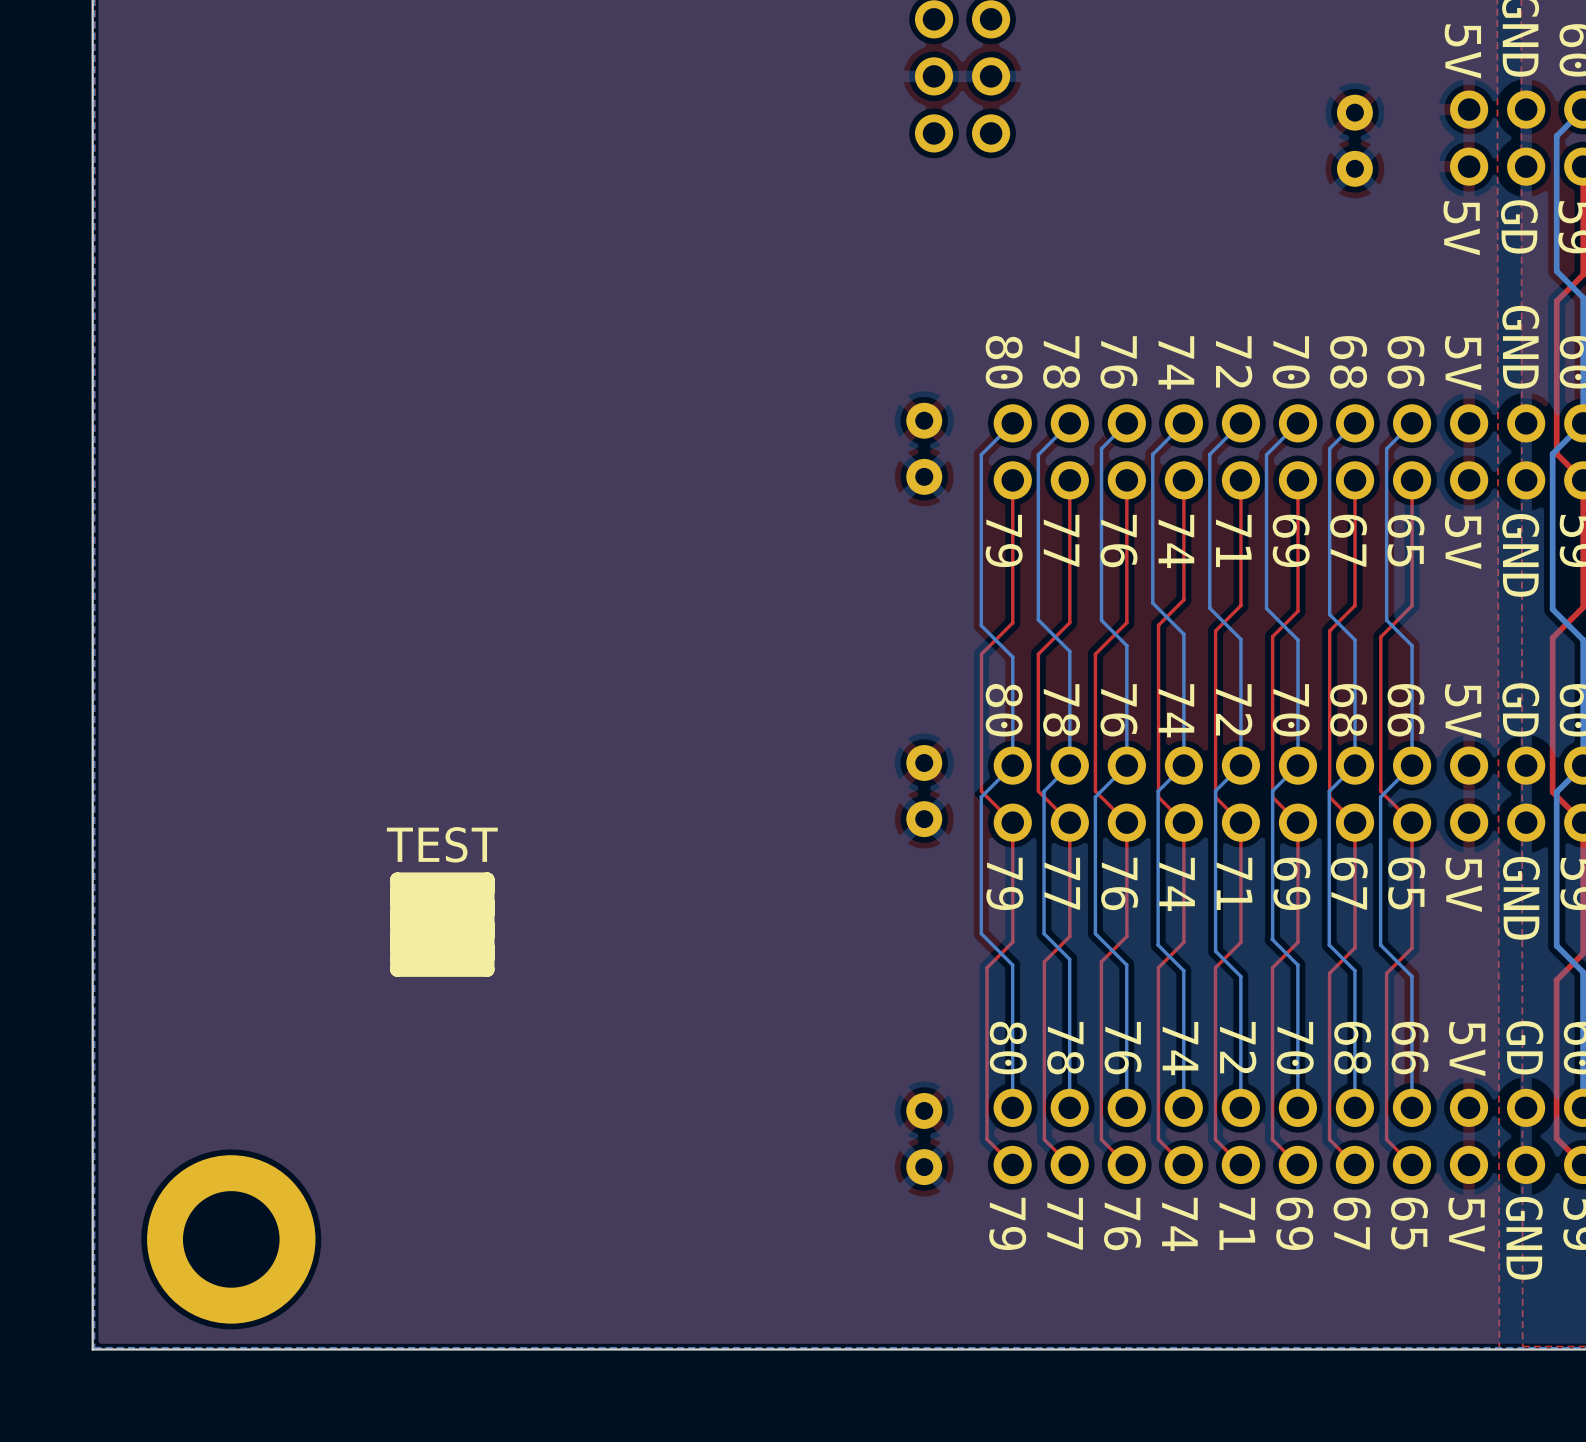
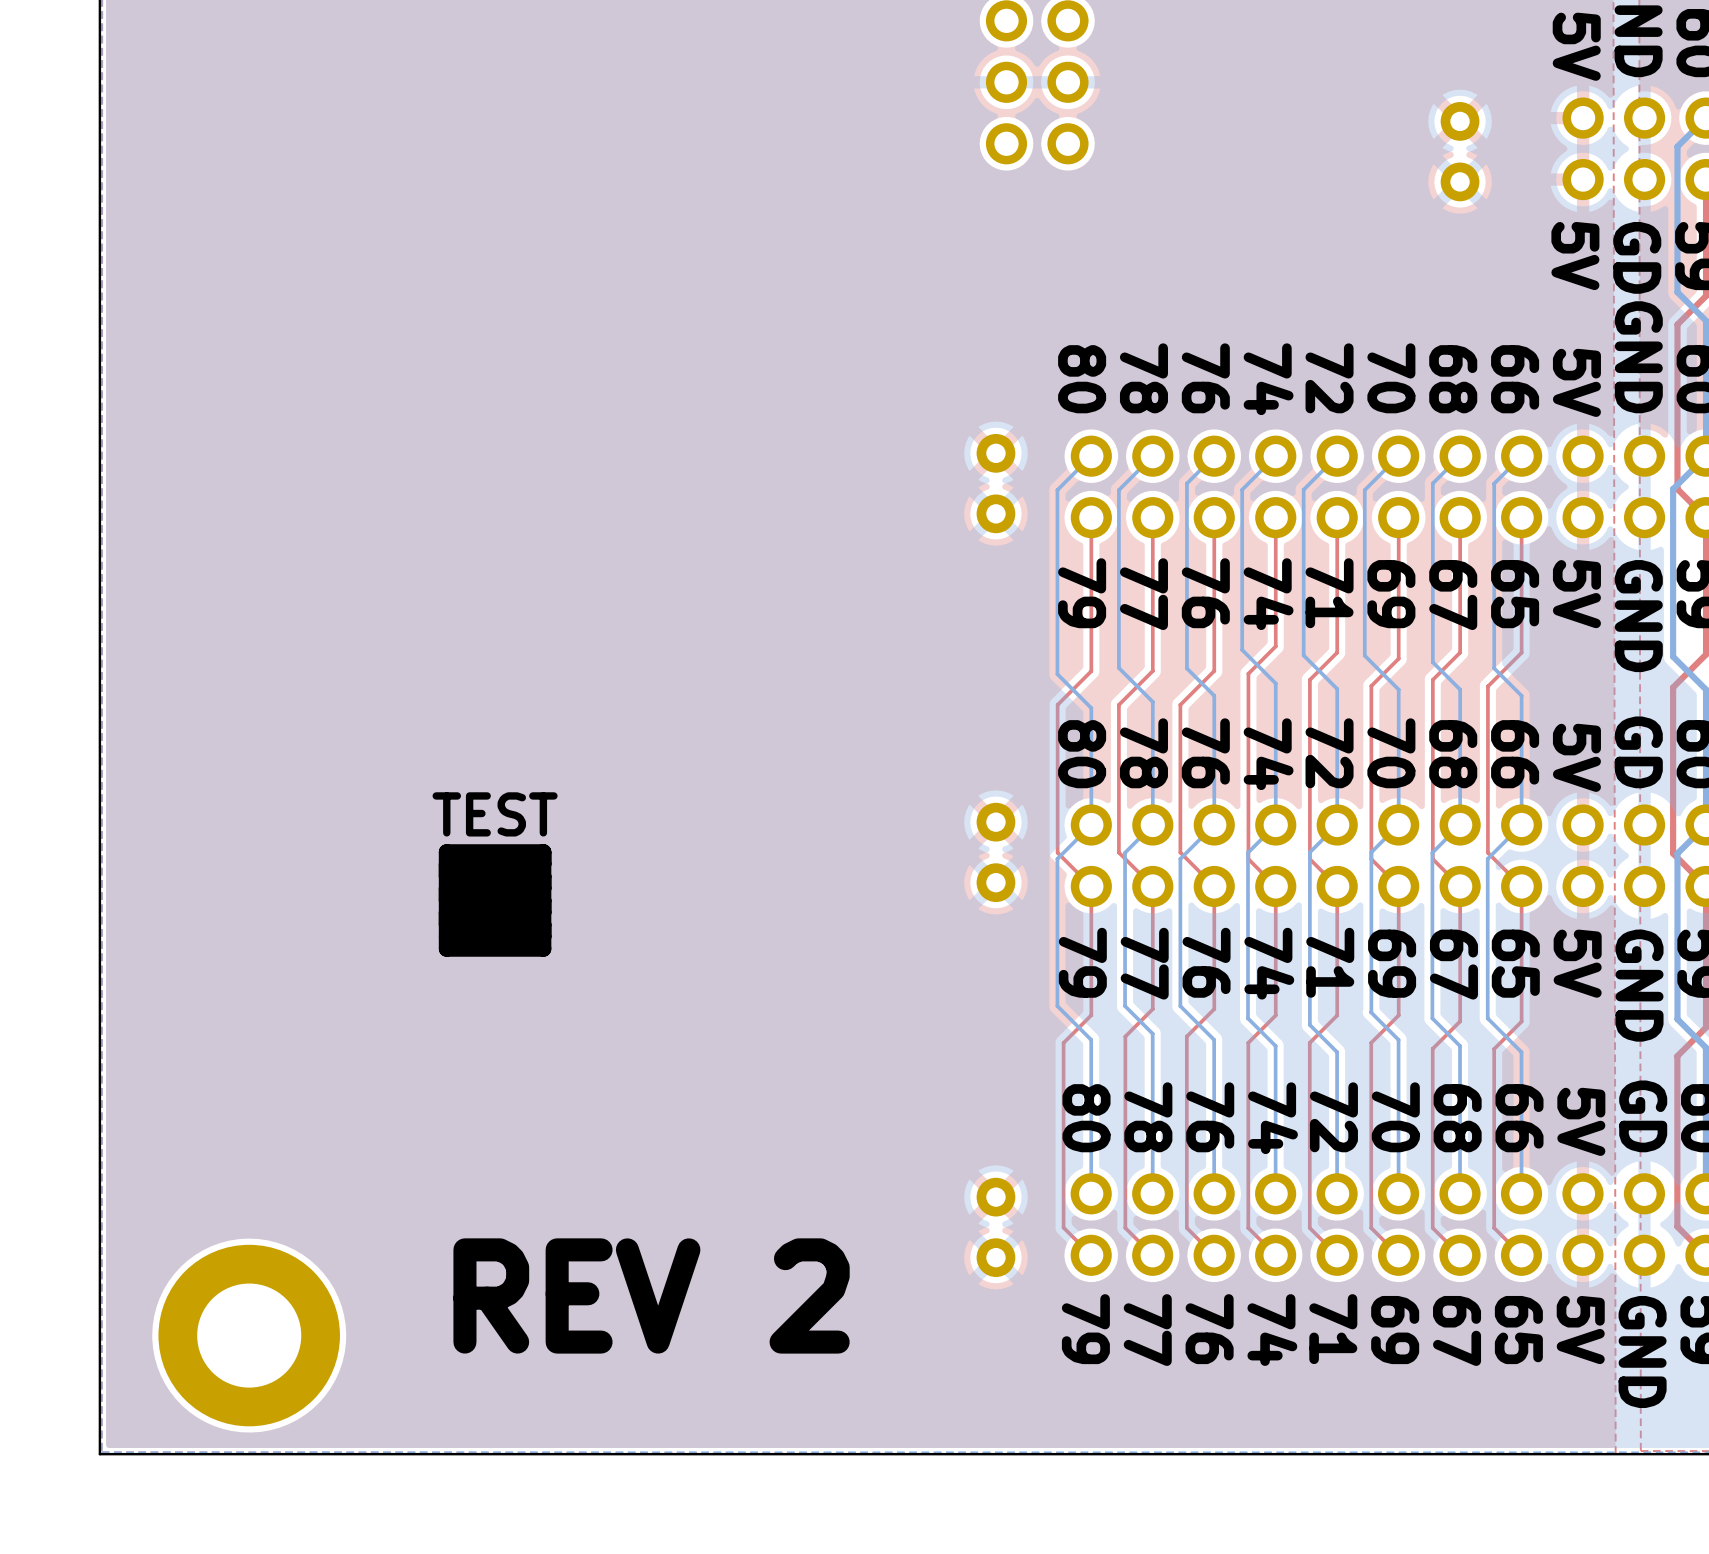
TEST position: (442, 924) -> (495, 900)
text: none -> REV 2 (651, 1295)

